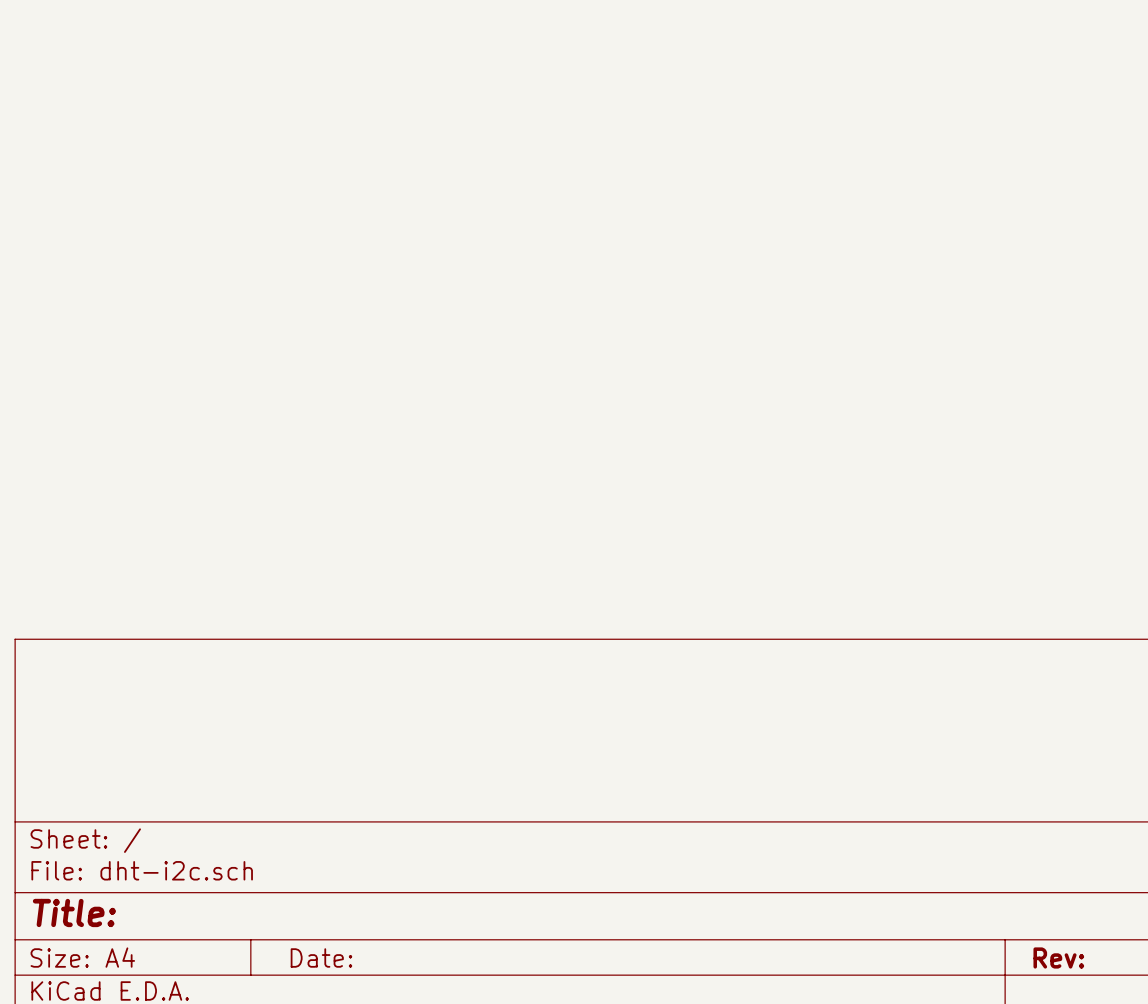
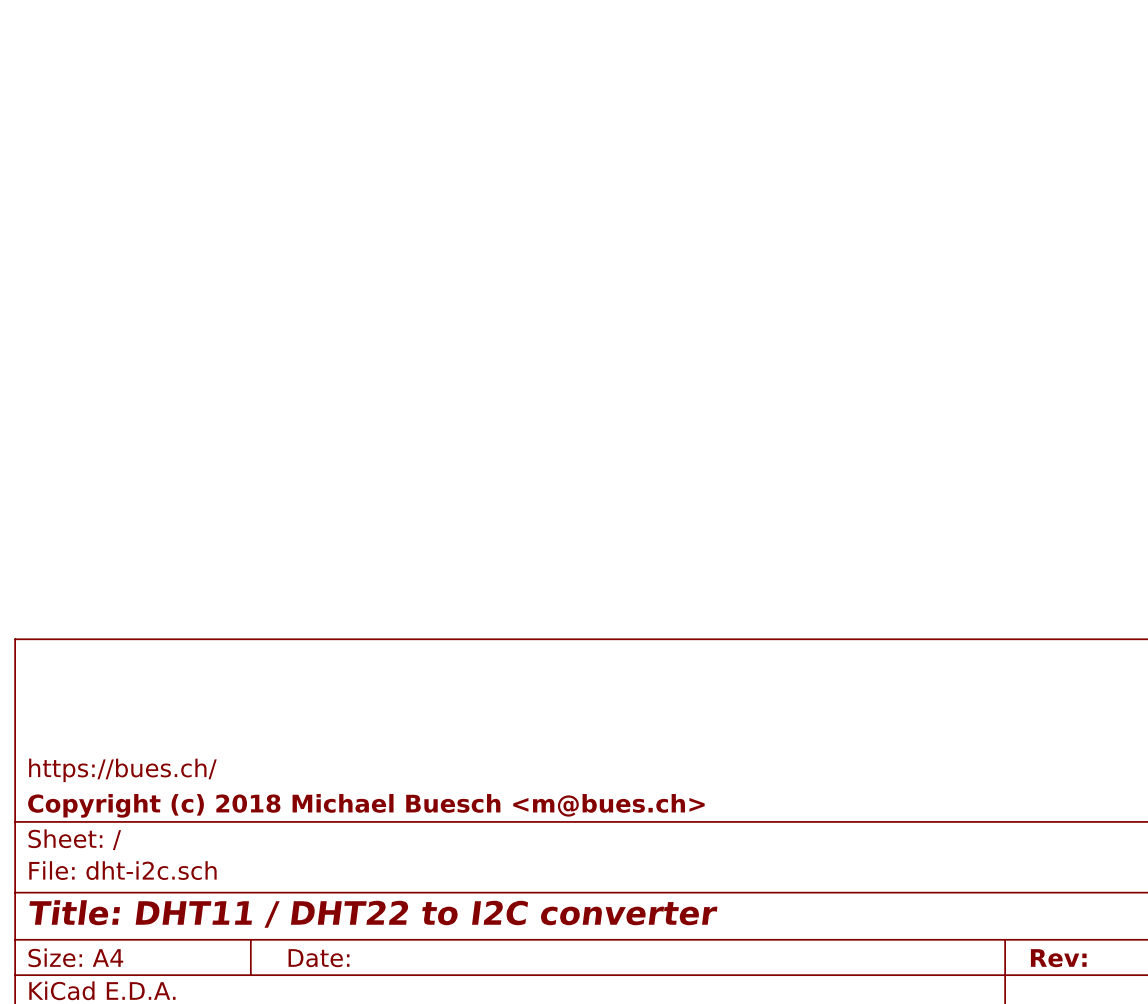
title block: none -> https://bues.ch/ (122, 770)
title block: none -> Copyright (c) 2018 Michael Buesch <m@bues.ch> (366, 805)
title block: Title: (74, 912) -> Title: DHT11 / DHT22 to I2C converter (373, 913)

